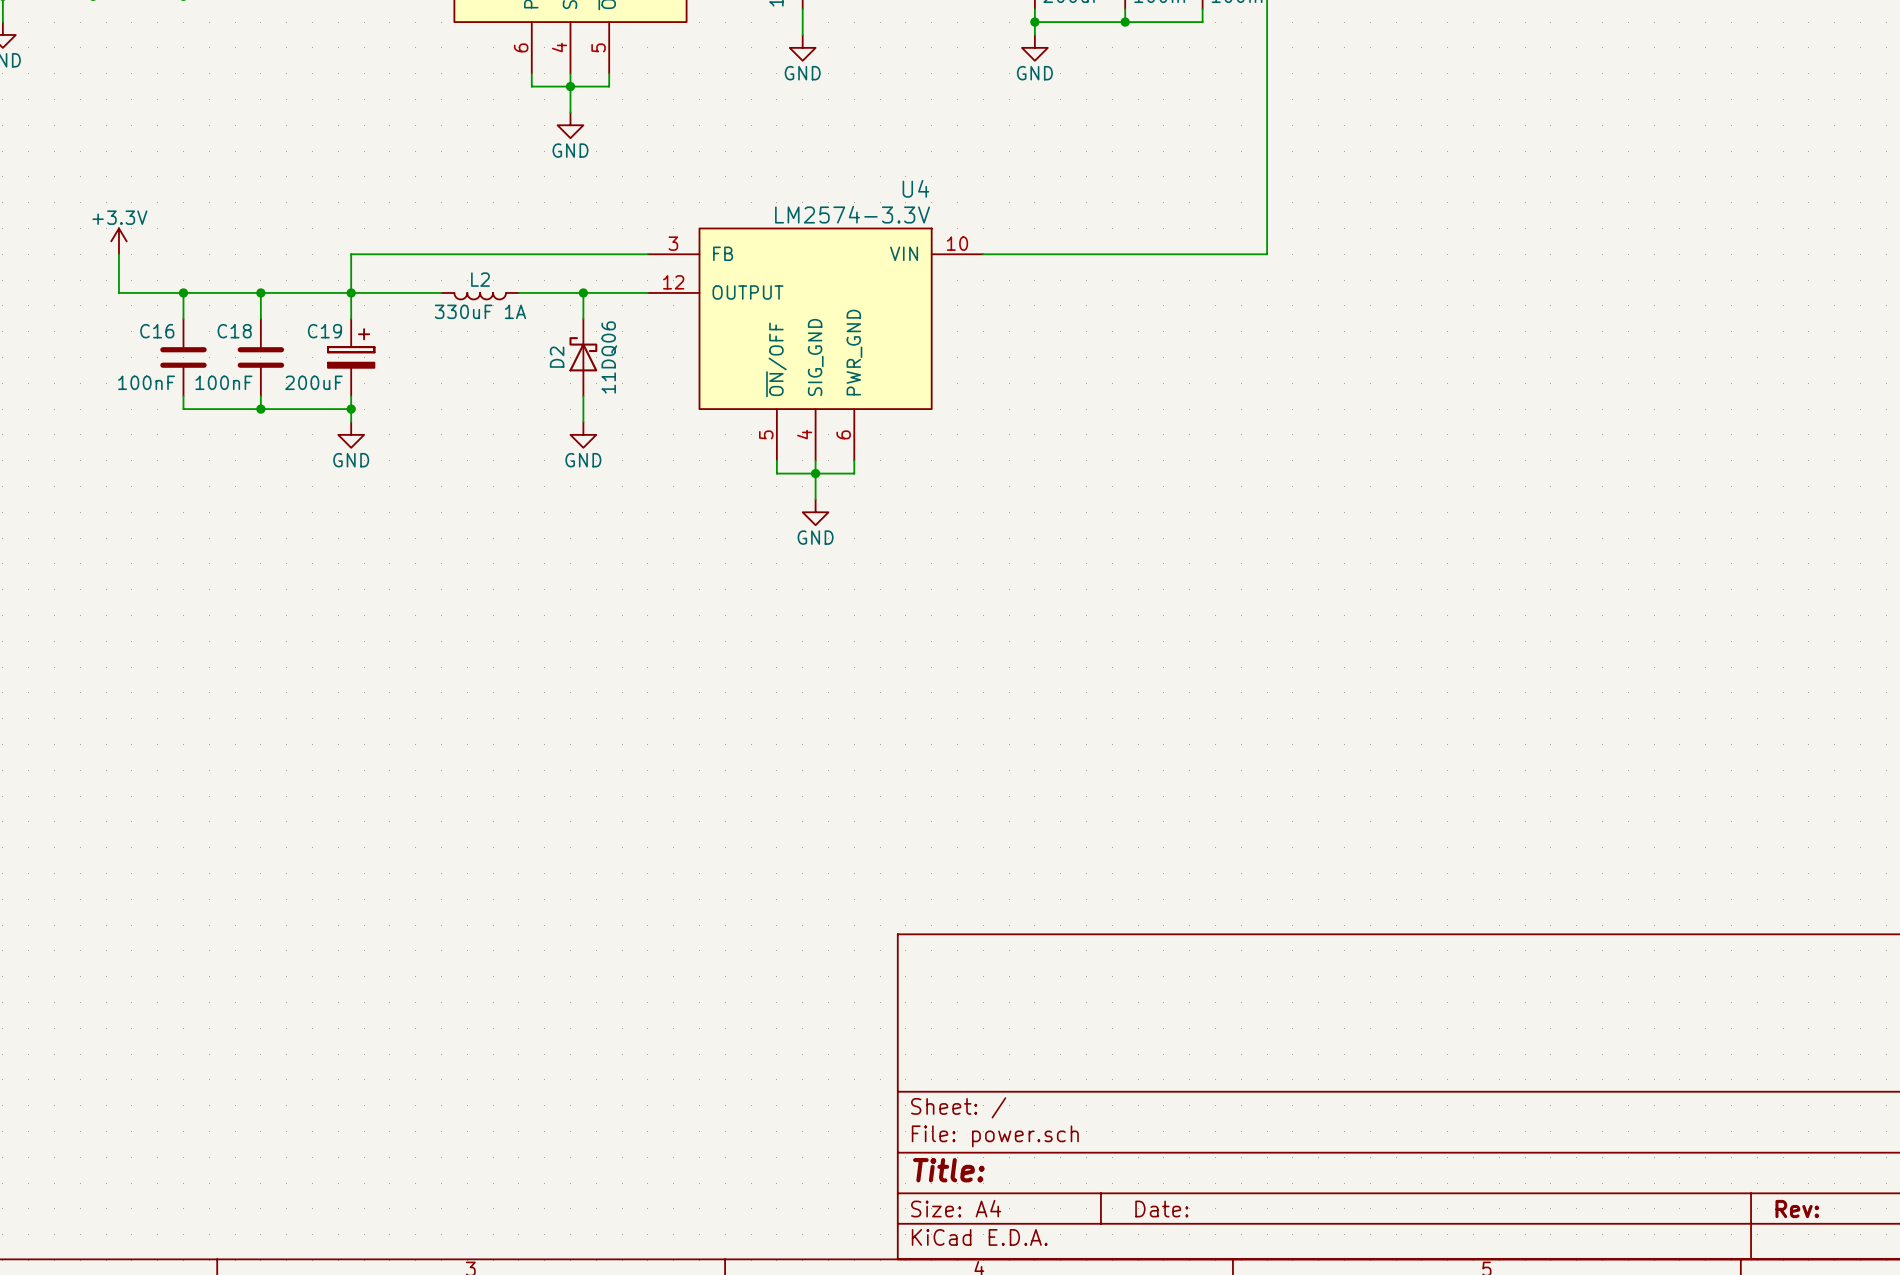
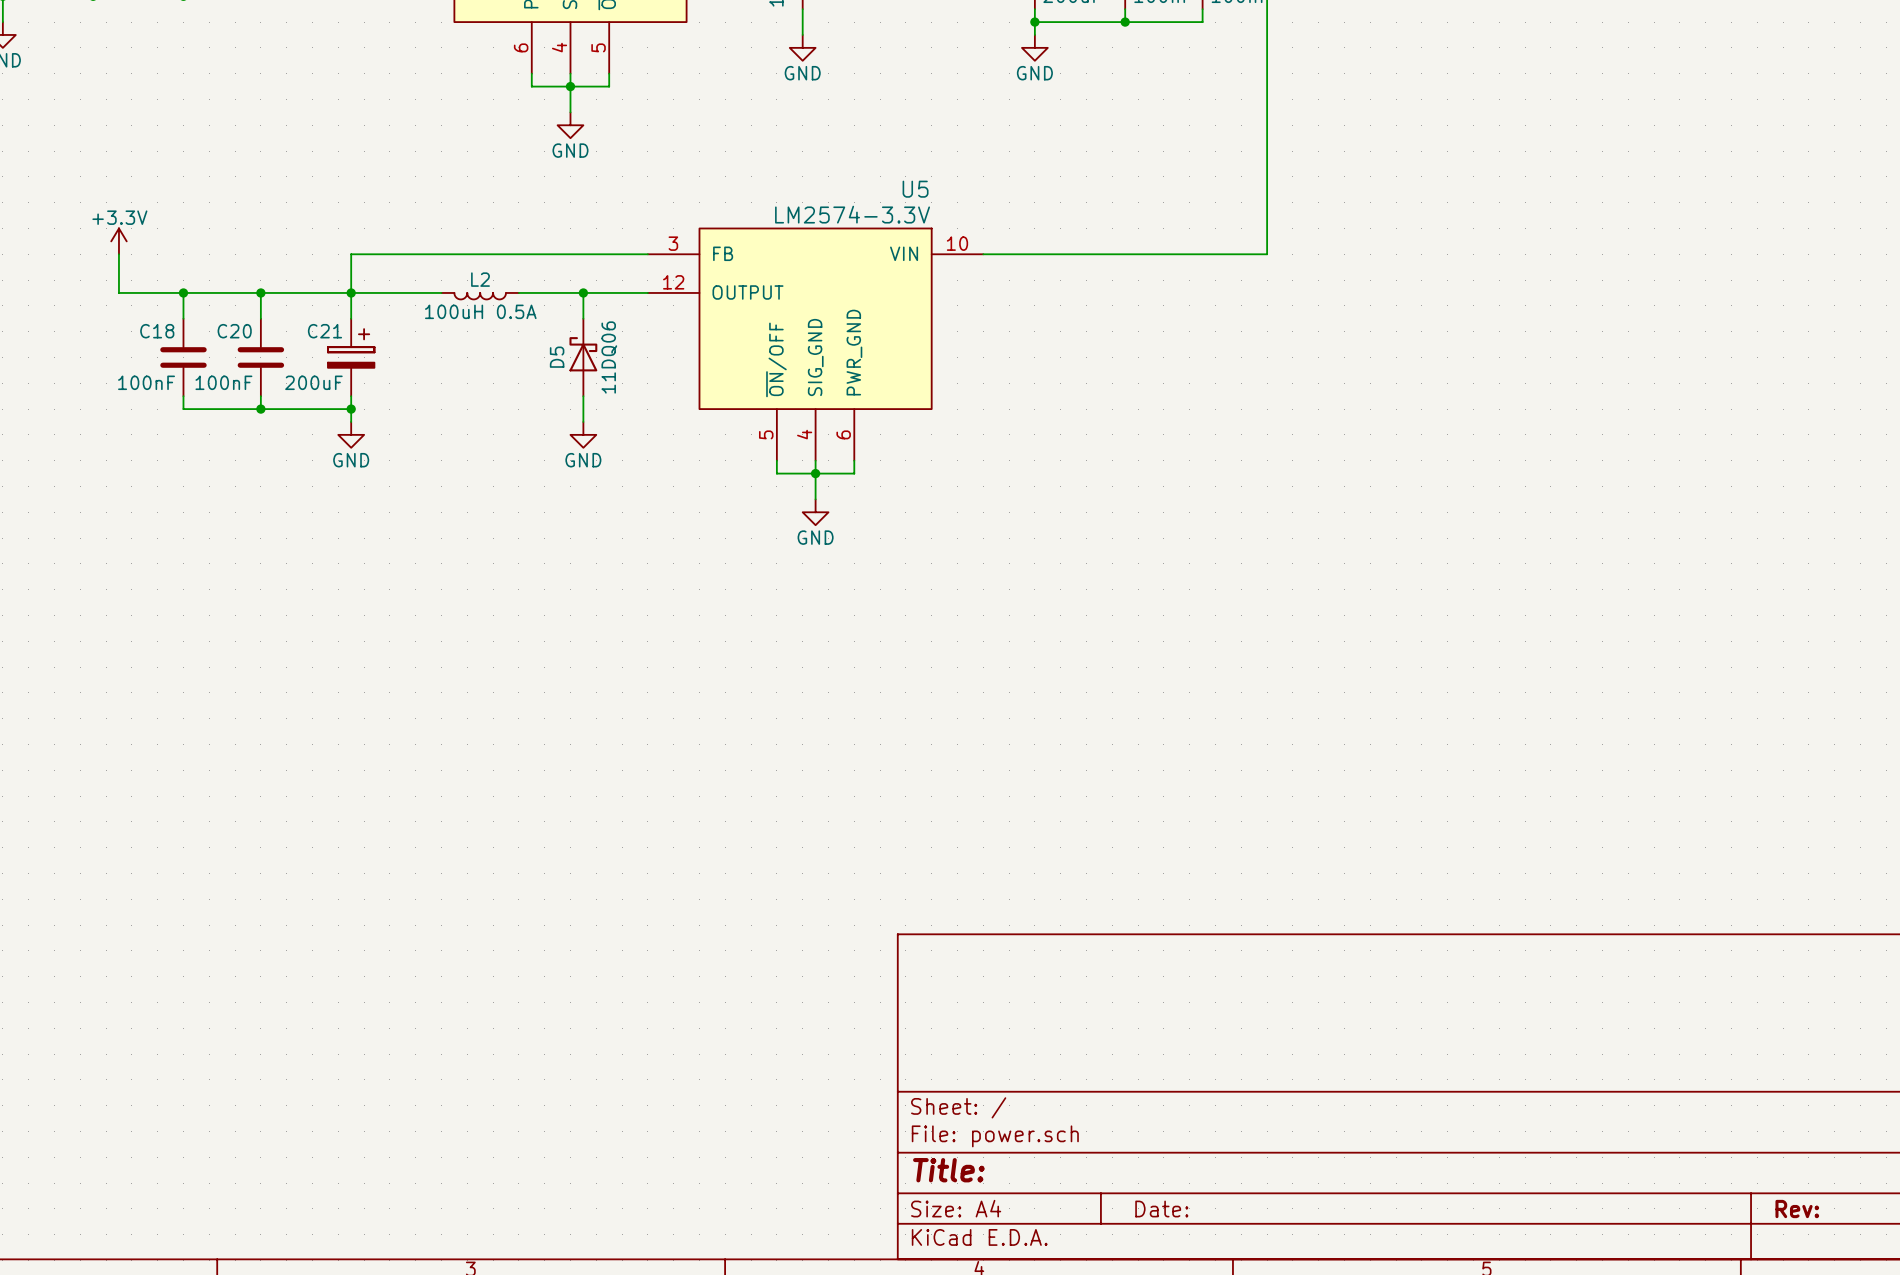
U4 name: U4 (915, 188) -> U5 (915, 189)
L2 value: 330uF 1A (480, 311) -> 100uH 0.5A (480, 311)
C16 name: C16 (157, 331) -> C18 (157, 331)
C18 name: C18 (234, 331) -> C20 (234, 331)
C19 name: C19 (324, 331) -> C21 (324, 331)
D2 name: D2 (557, 357) -> D5 (557, 357)

